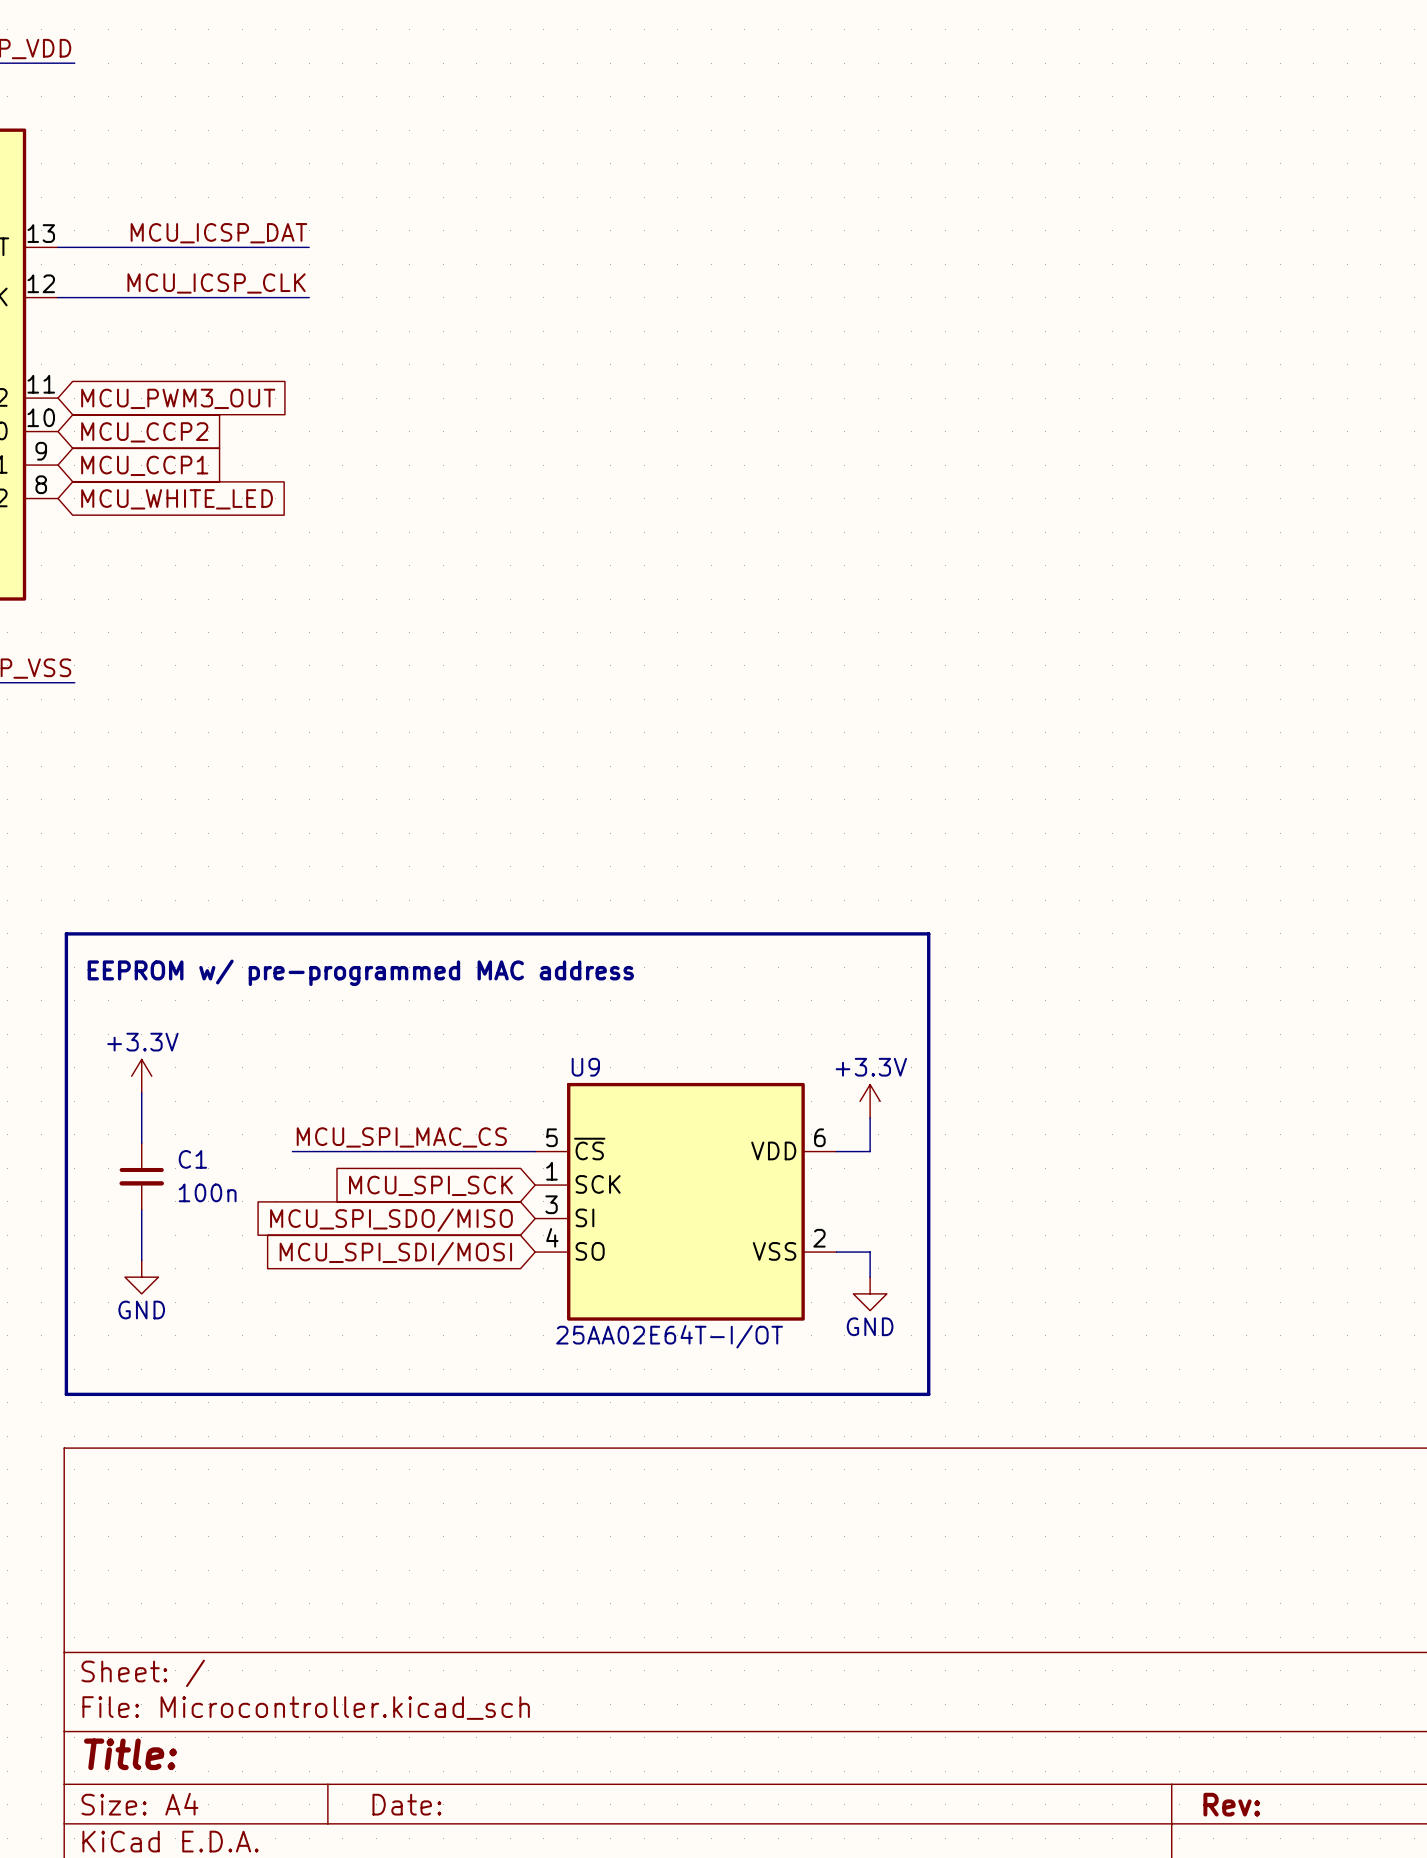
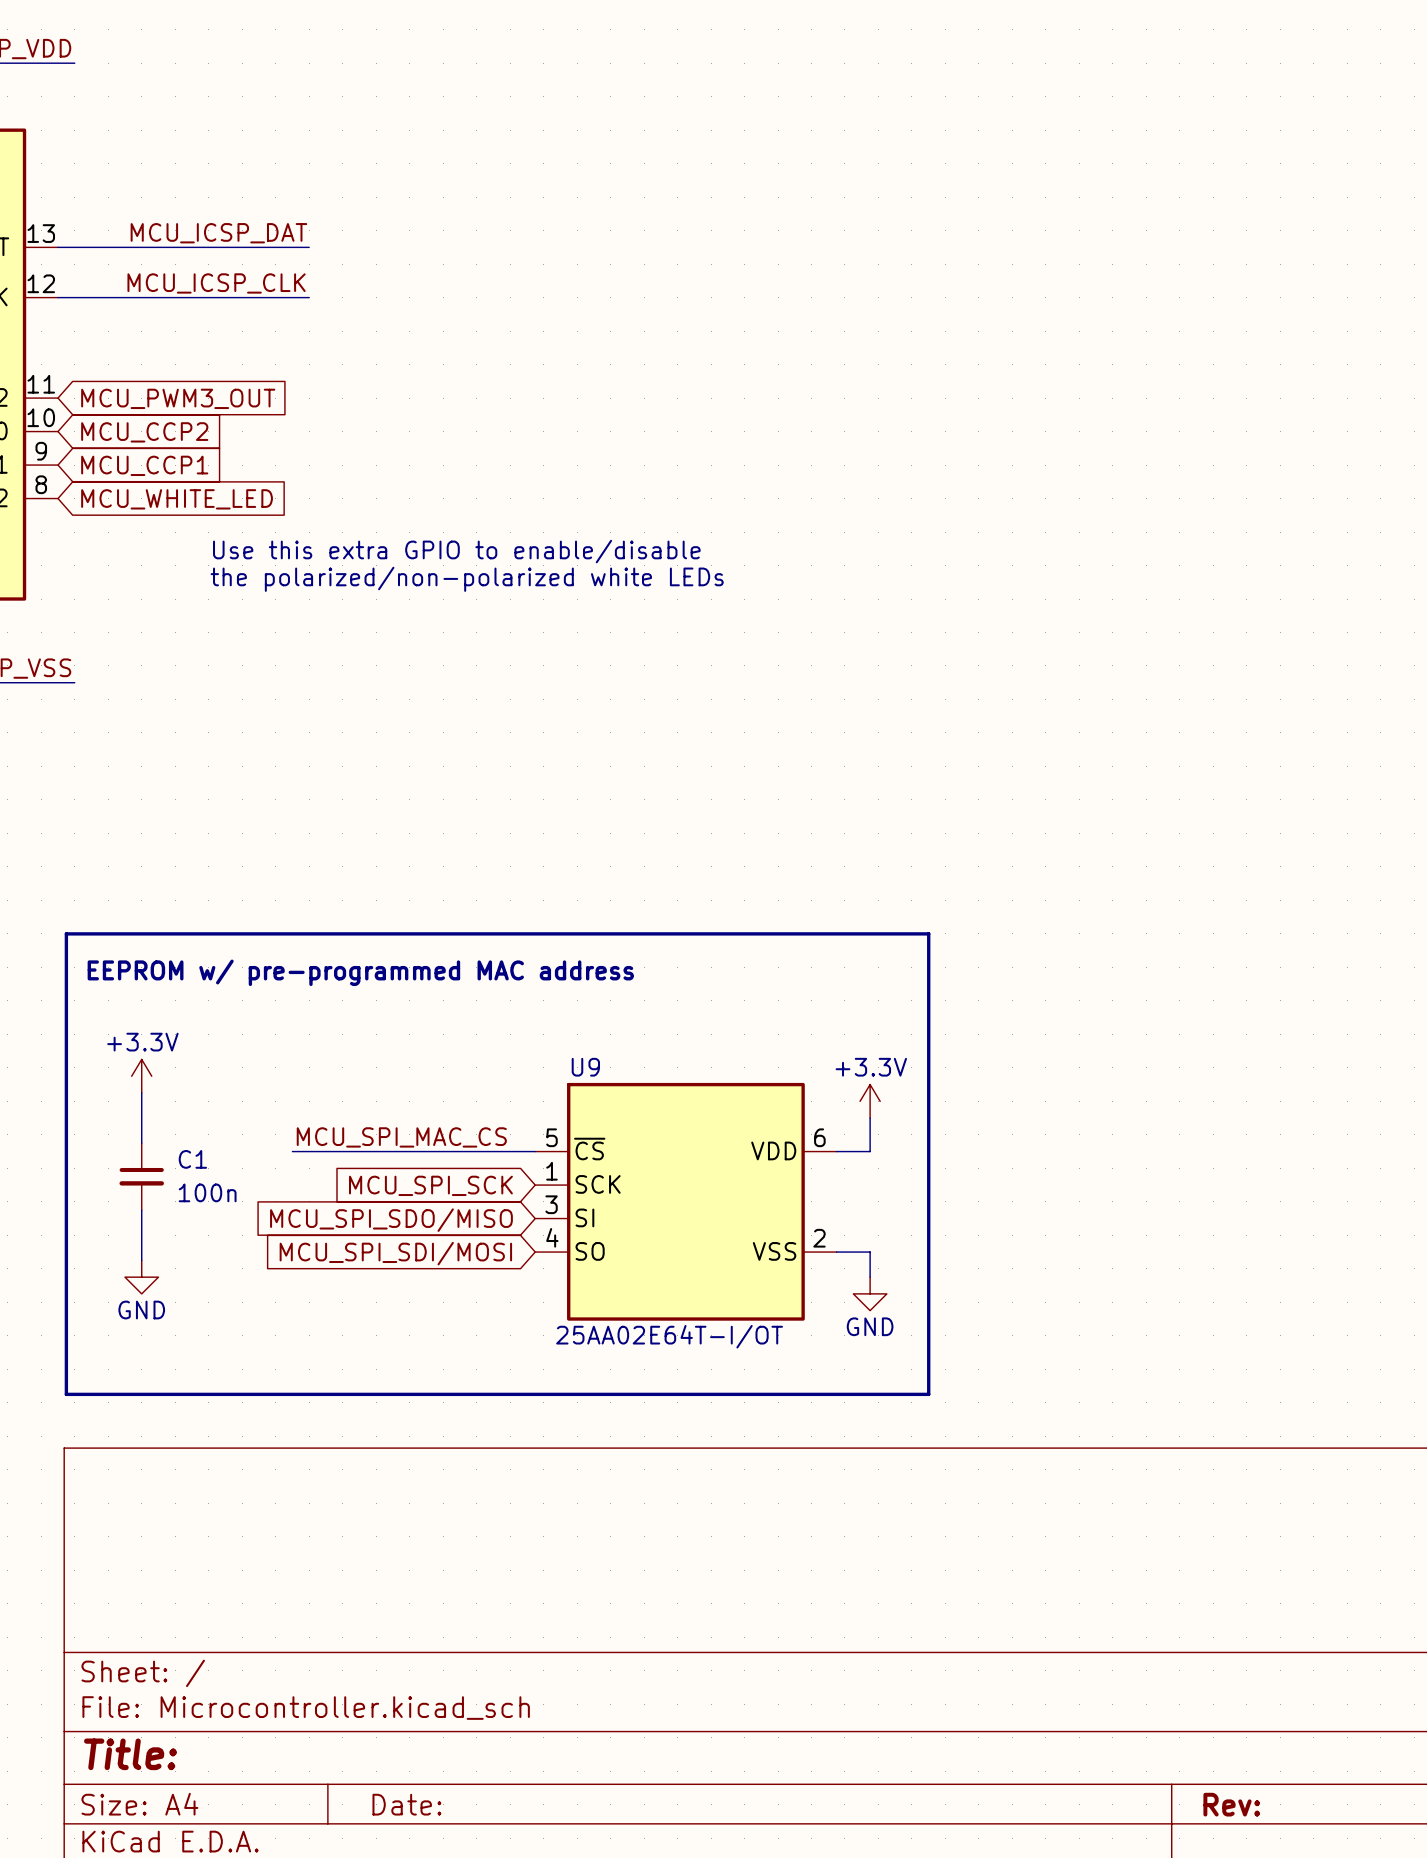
text: none -> Use this extra GPIO to enable/disable (456, 551)
text: none -> the polarized/non-polarized white LEDs (467, 579)

